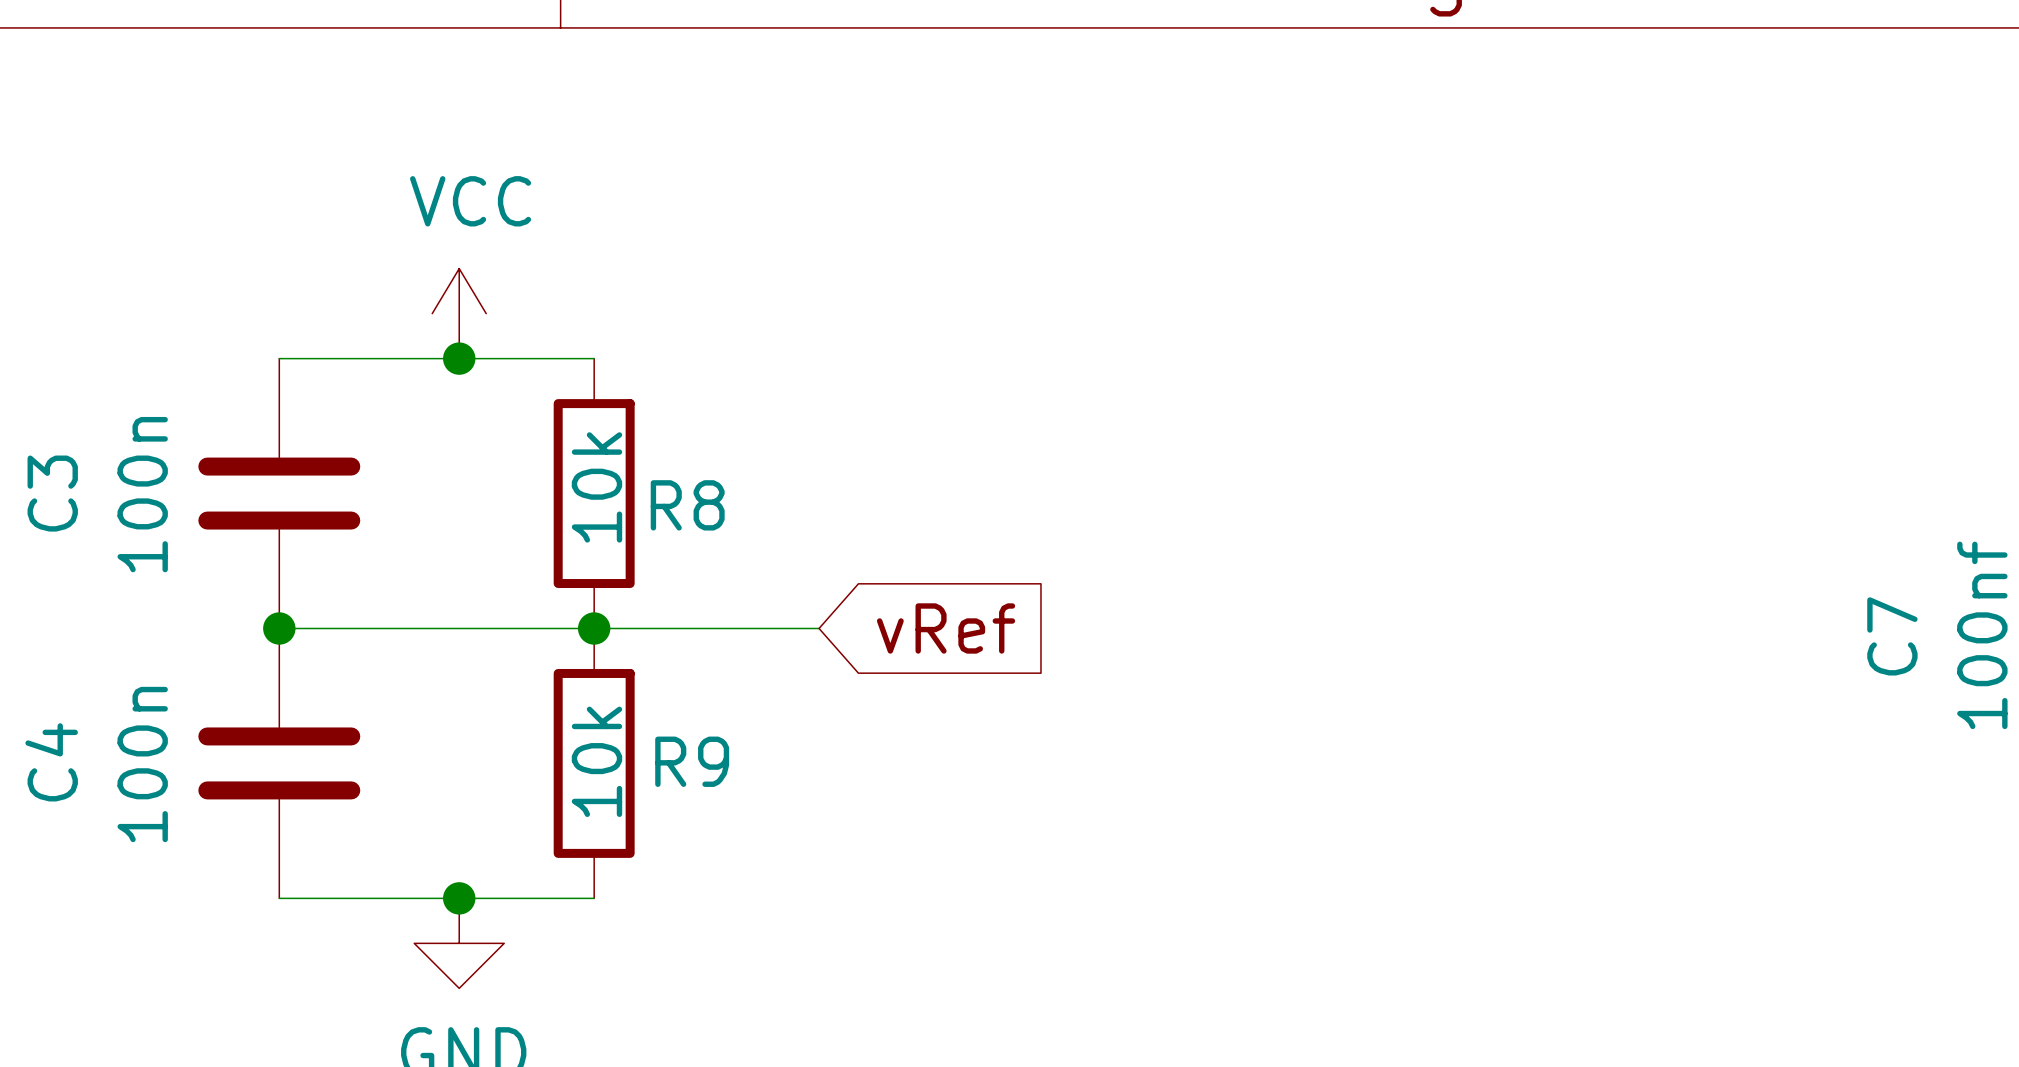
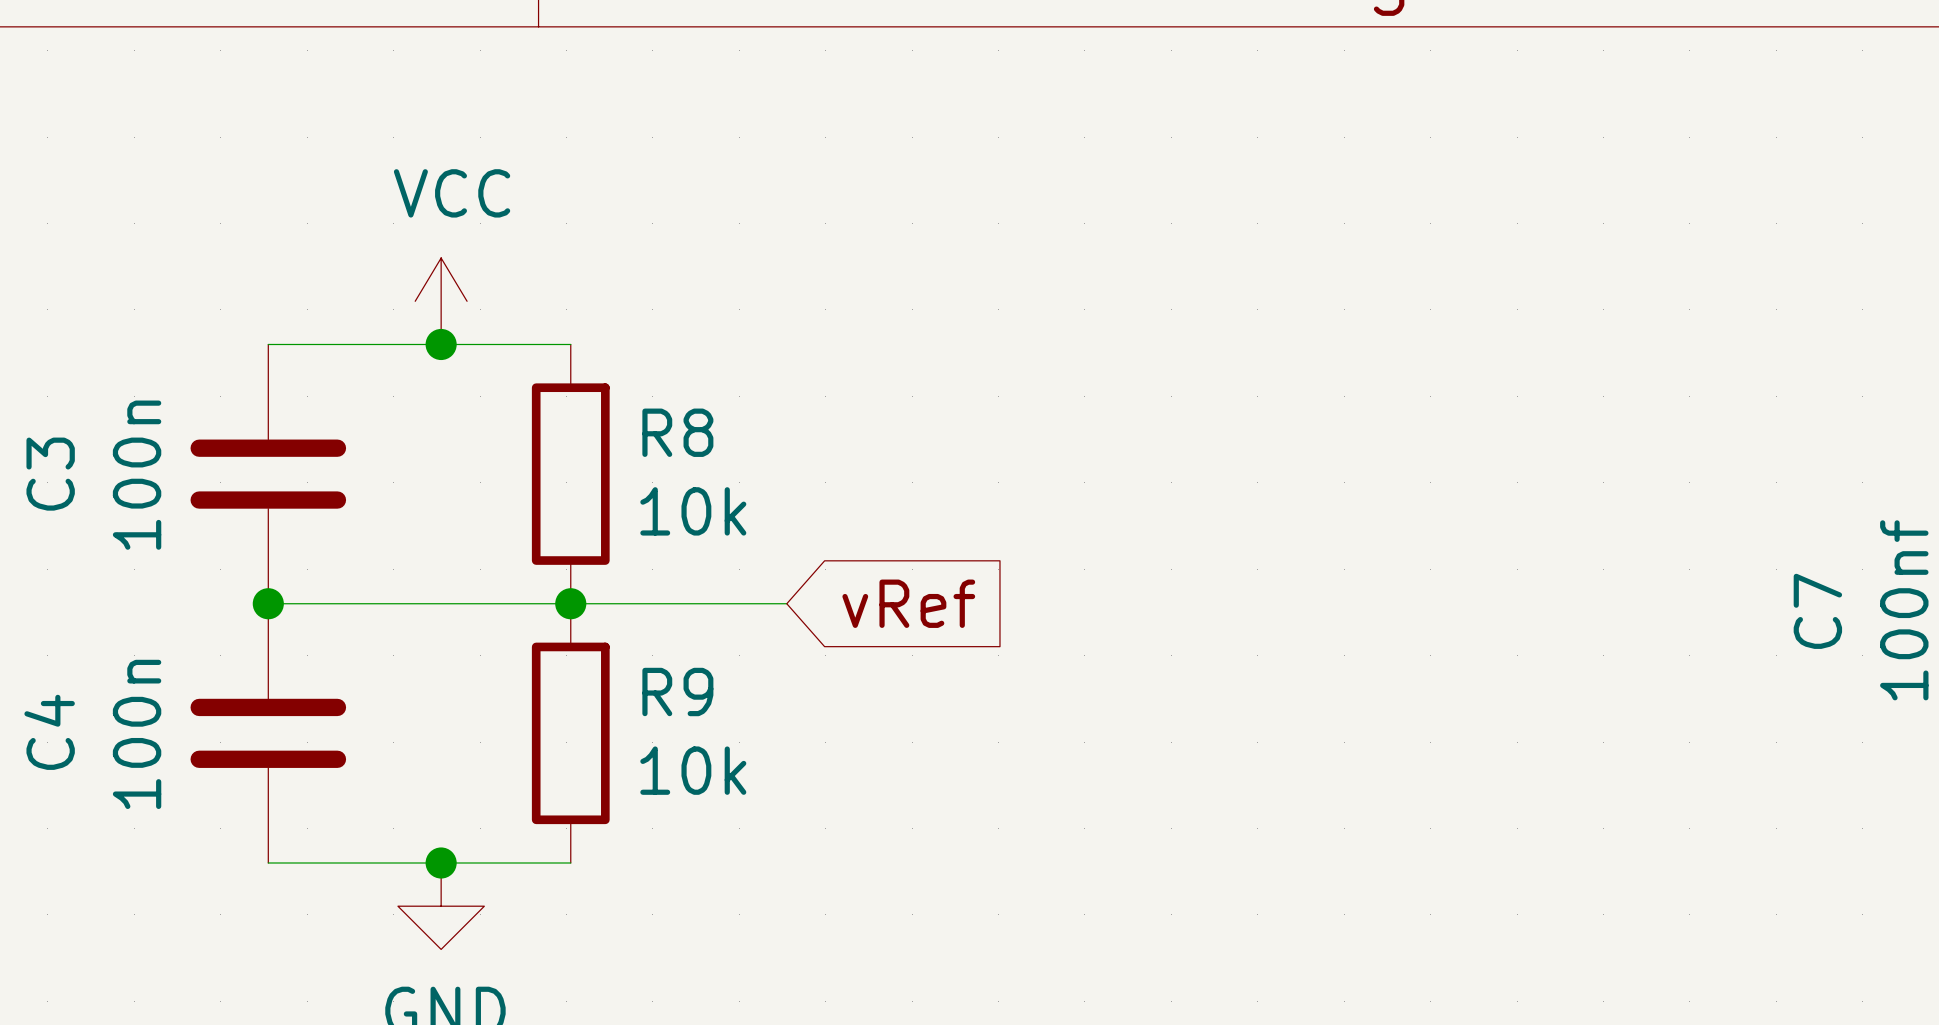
R8 value rotation: 0° (596, 487) -> 90° clockwise (693, 511)
R8 name position: R8 (687, 505) -> R8 (677, 432)
R9 value rotation: 0° (596, 761) -> 90° clockwise (693, 770)
R9 name position: R9 (692, 761) -> R9 (677, 692)

